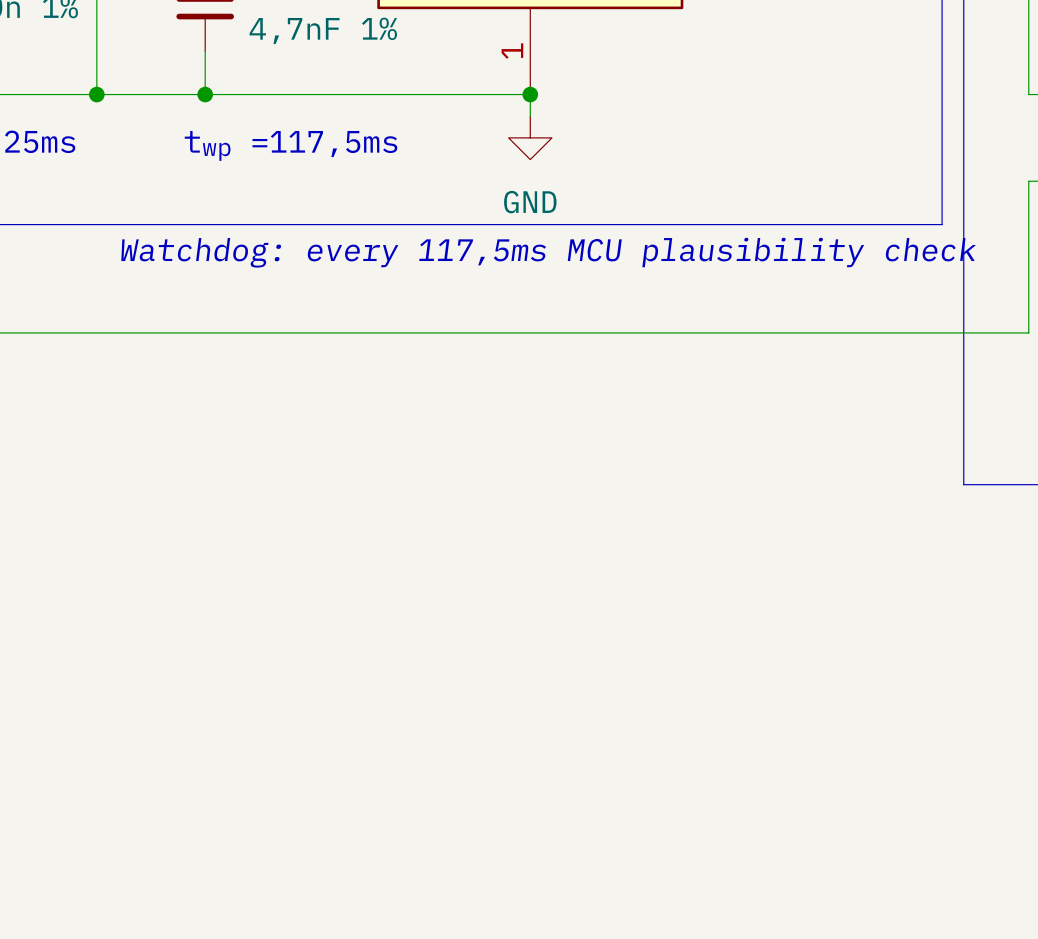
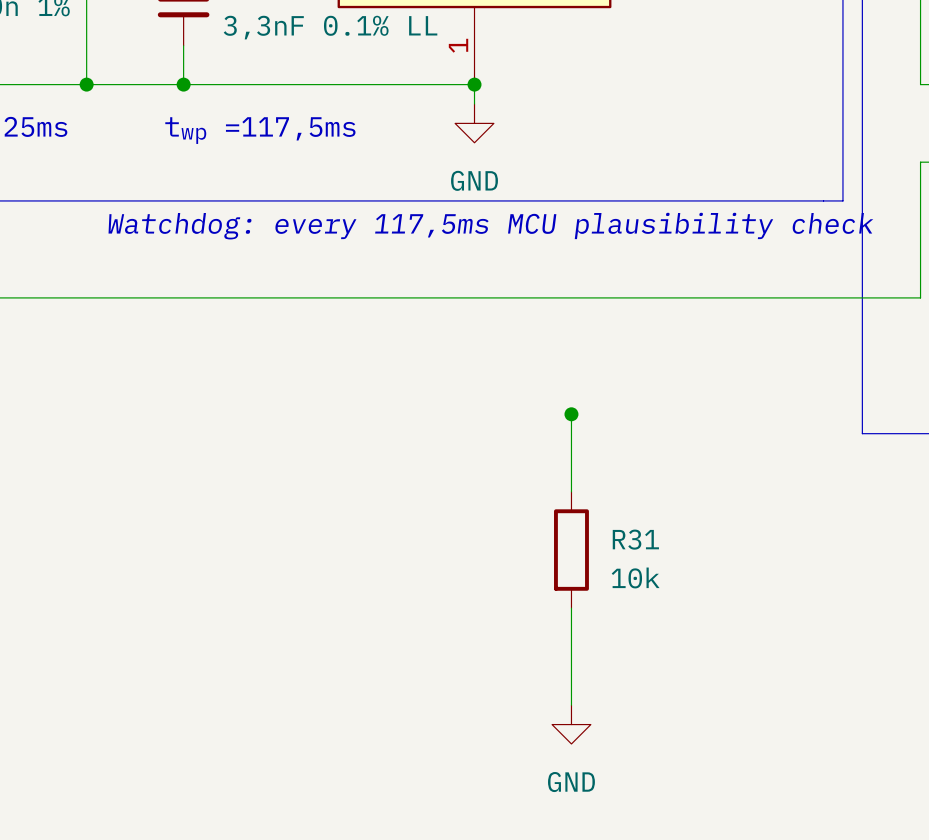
part value: 4,7nF 1% (323, 30) -> 3,3nF 0.1% LL (330, 27)
wire: none -> (571, 414) (571, 491)
junction: none -> (571, 414)
R31: none -> 10k (571, 550)
wire: none -> (571, 608) (571, 705)
power symbol: none -> GND (571, 724)

